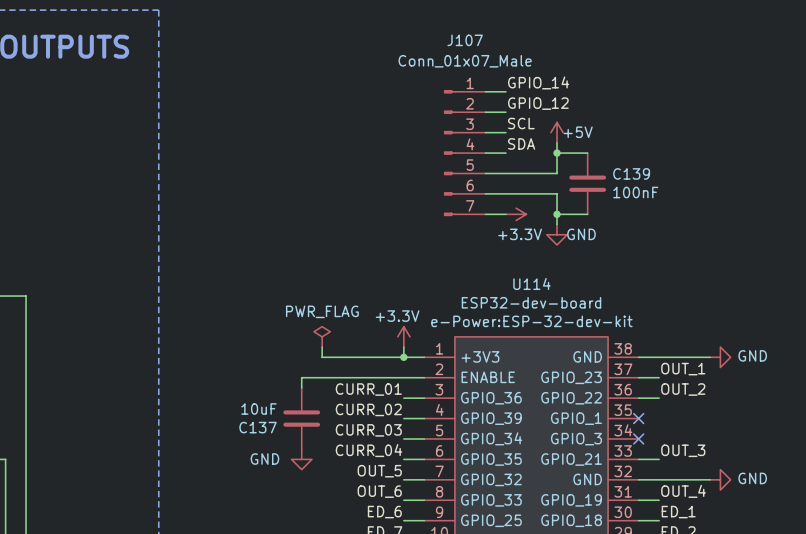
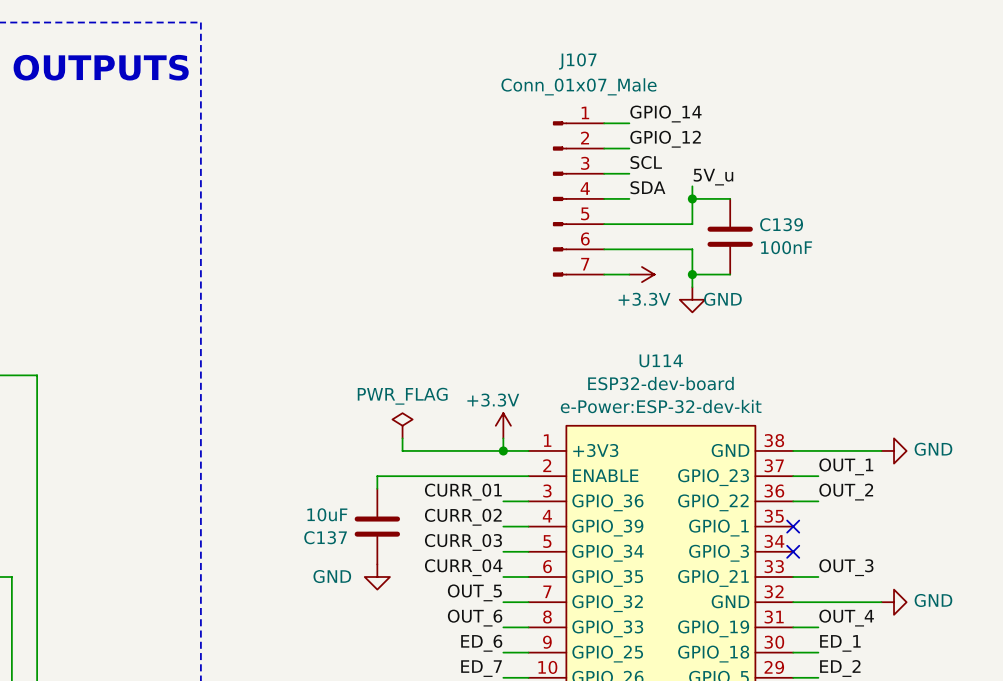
power symbol: +5V (557, 132) -> none
label: none -> 5V_u (713, 177)

